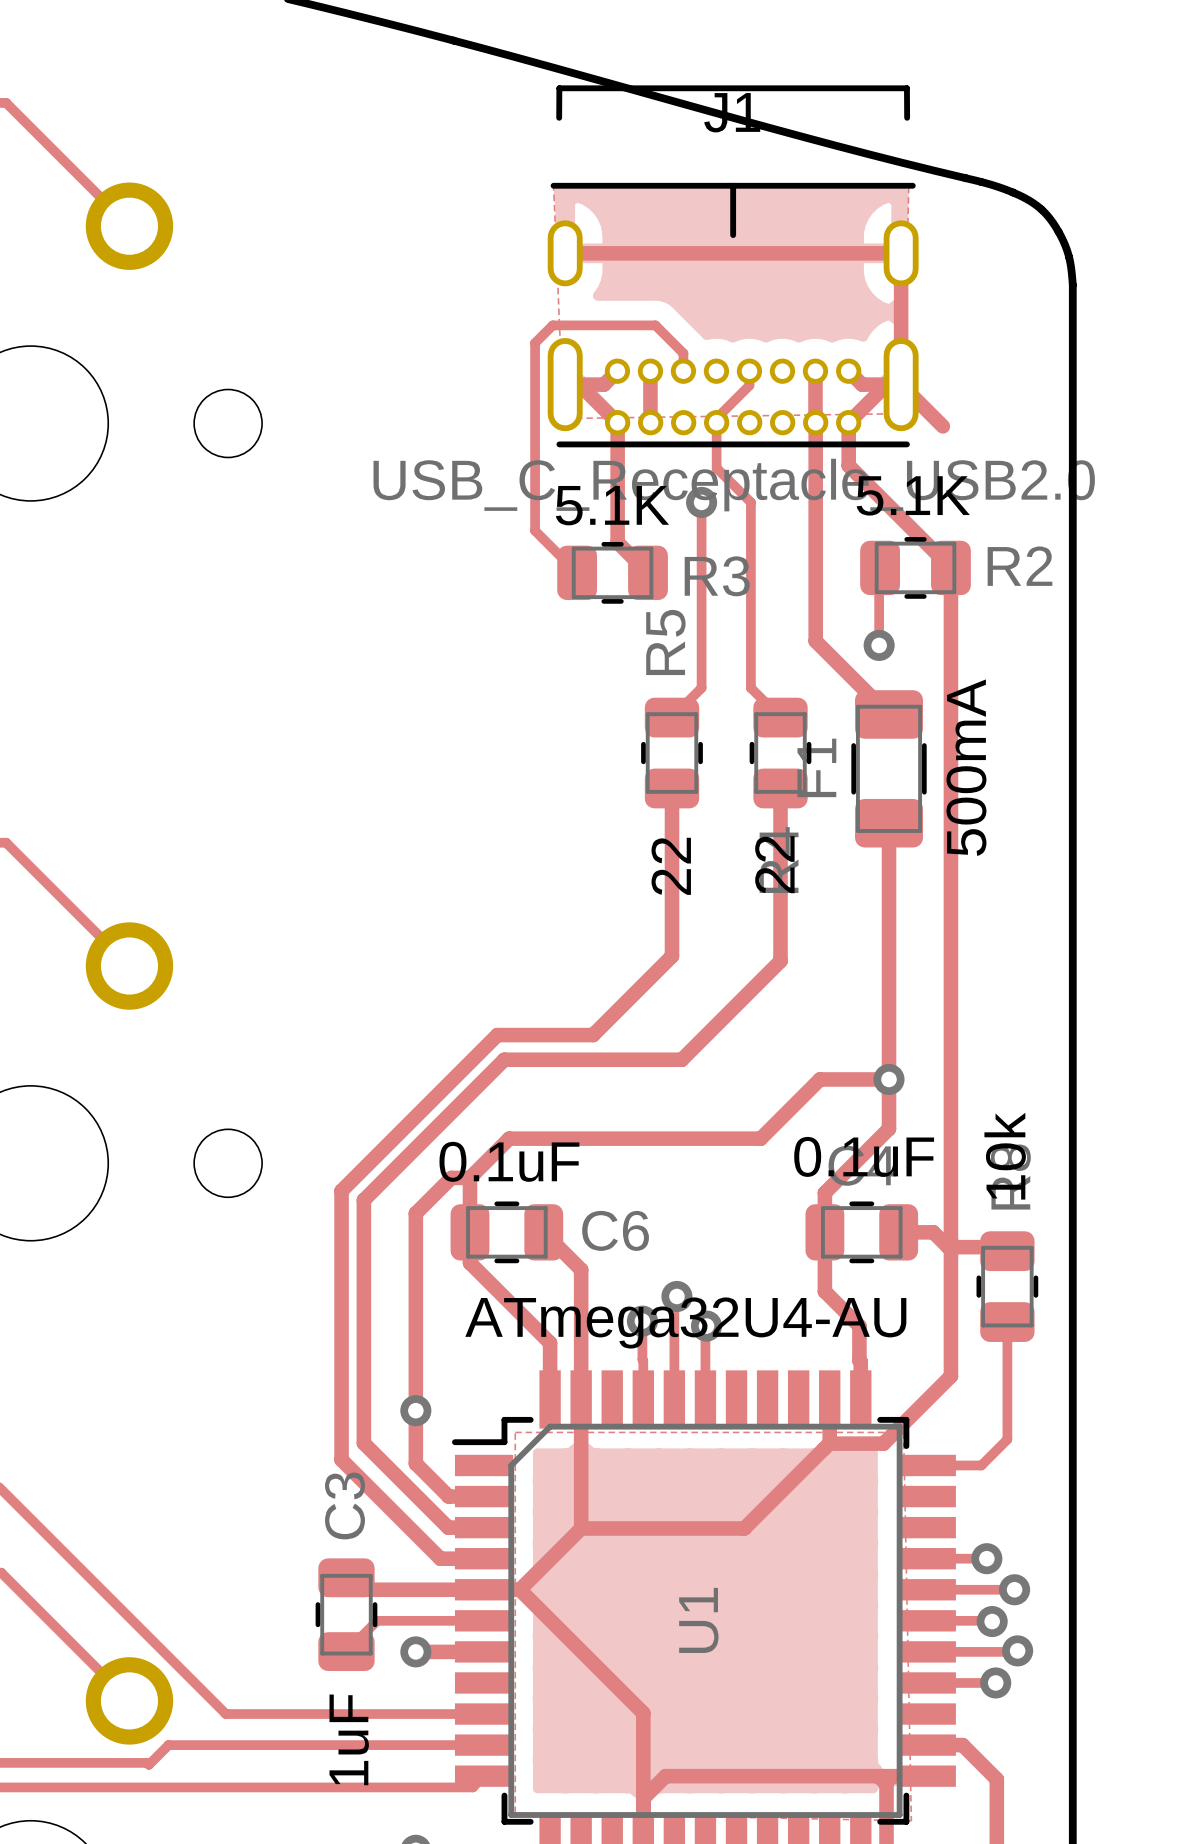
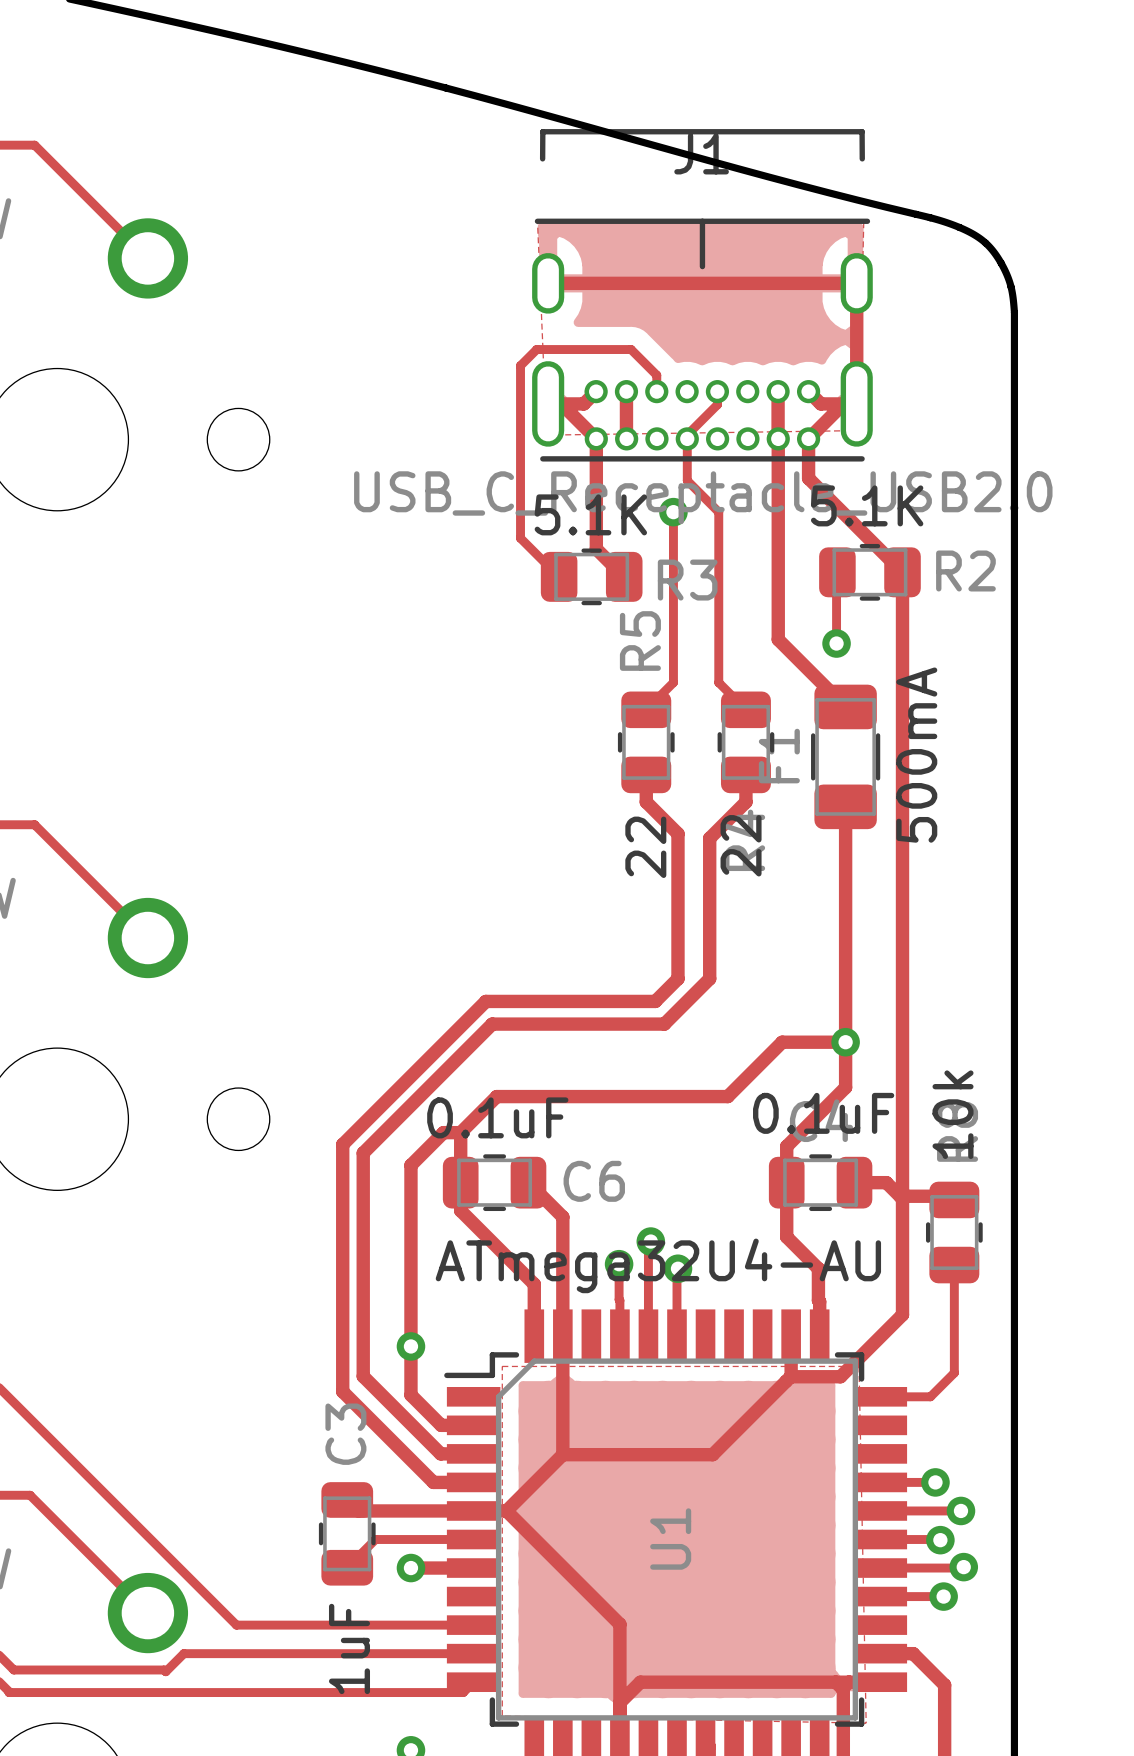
track: (901, 384) (942, 426) -> none
track: (672, 818) (672, 956) (593, 1035) -> (646, 802) (677, 833) (677, 978) (655, 1001) (573, 1001)
track: (780, 818) (780, 961) (681, 1059) -> (745, 802) (709, 838) (709, 978) (664, 1024) (655, 1024)

